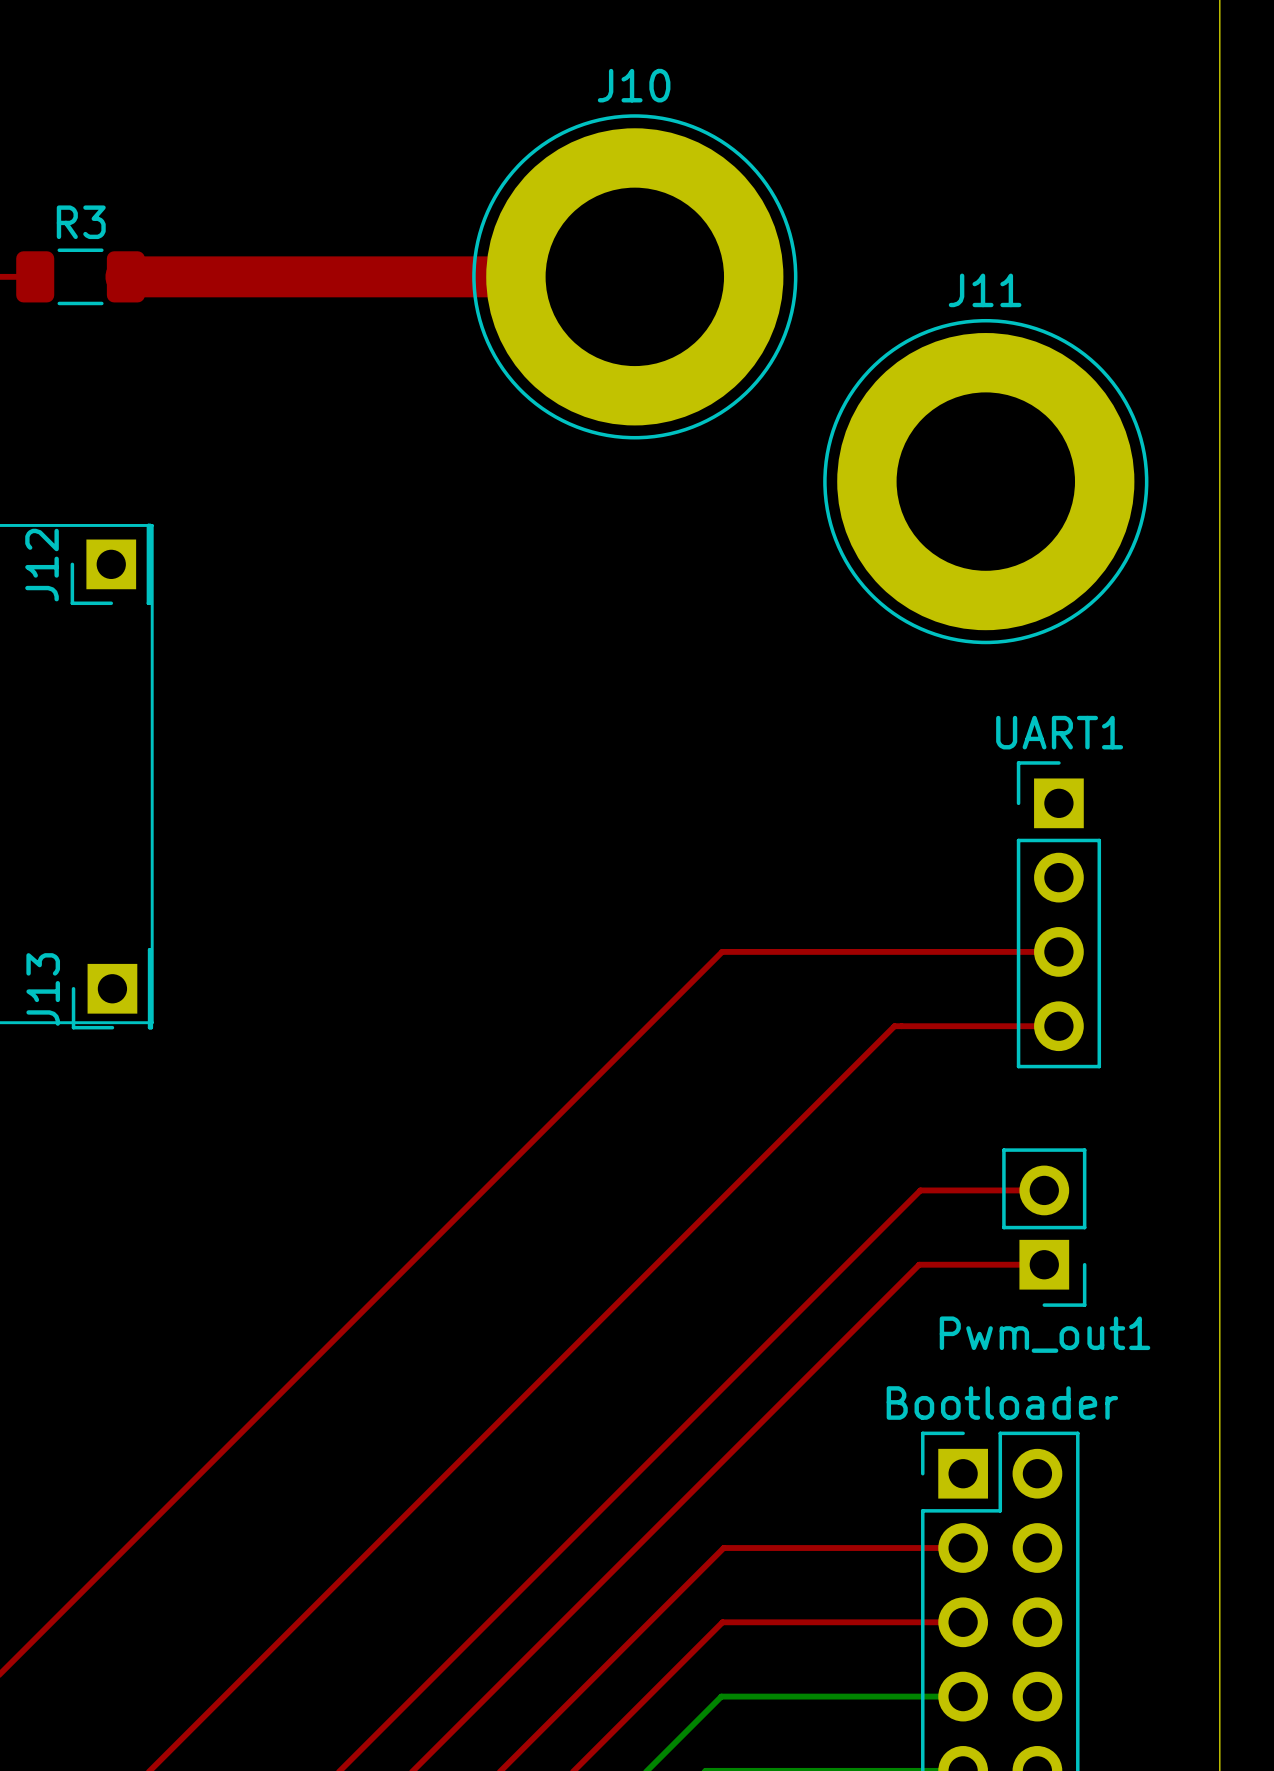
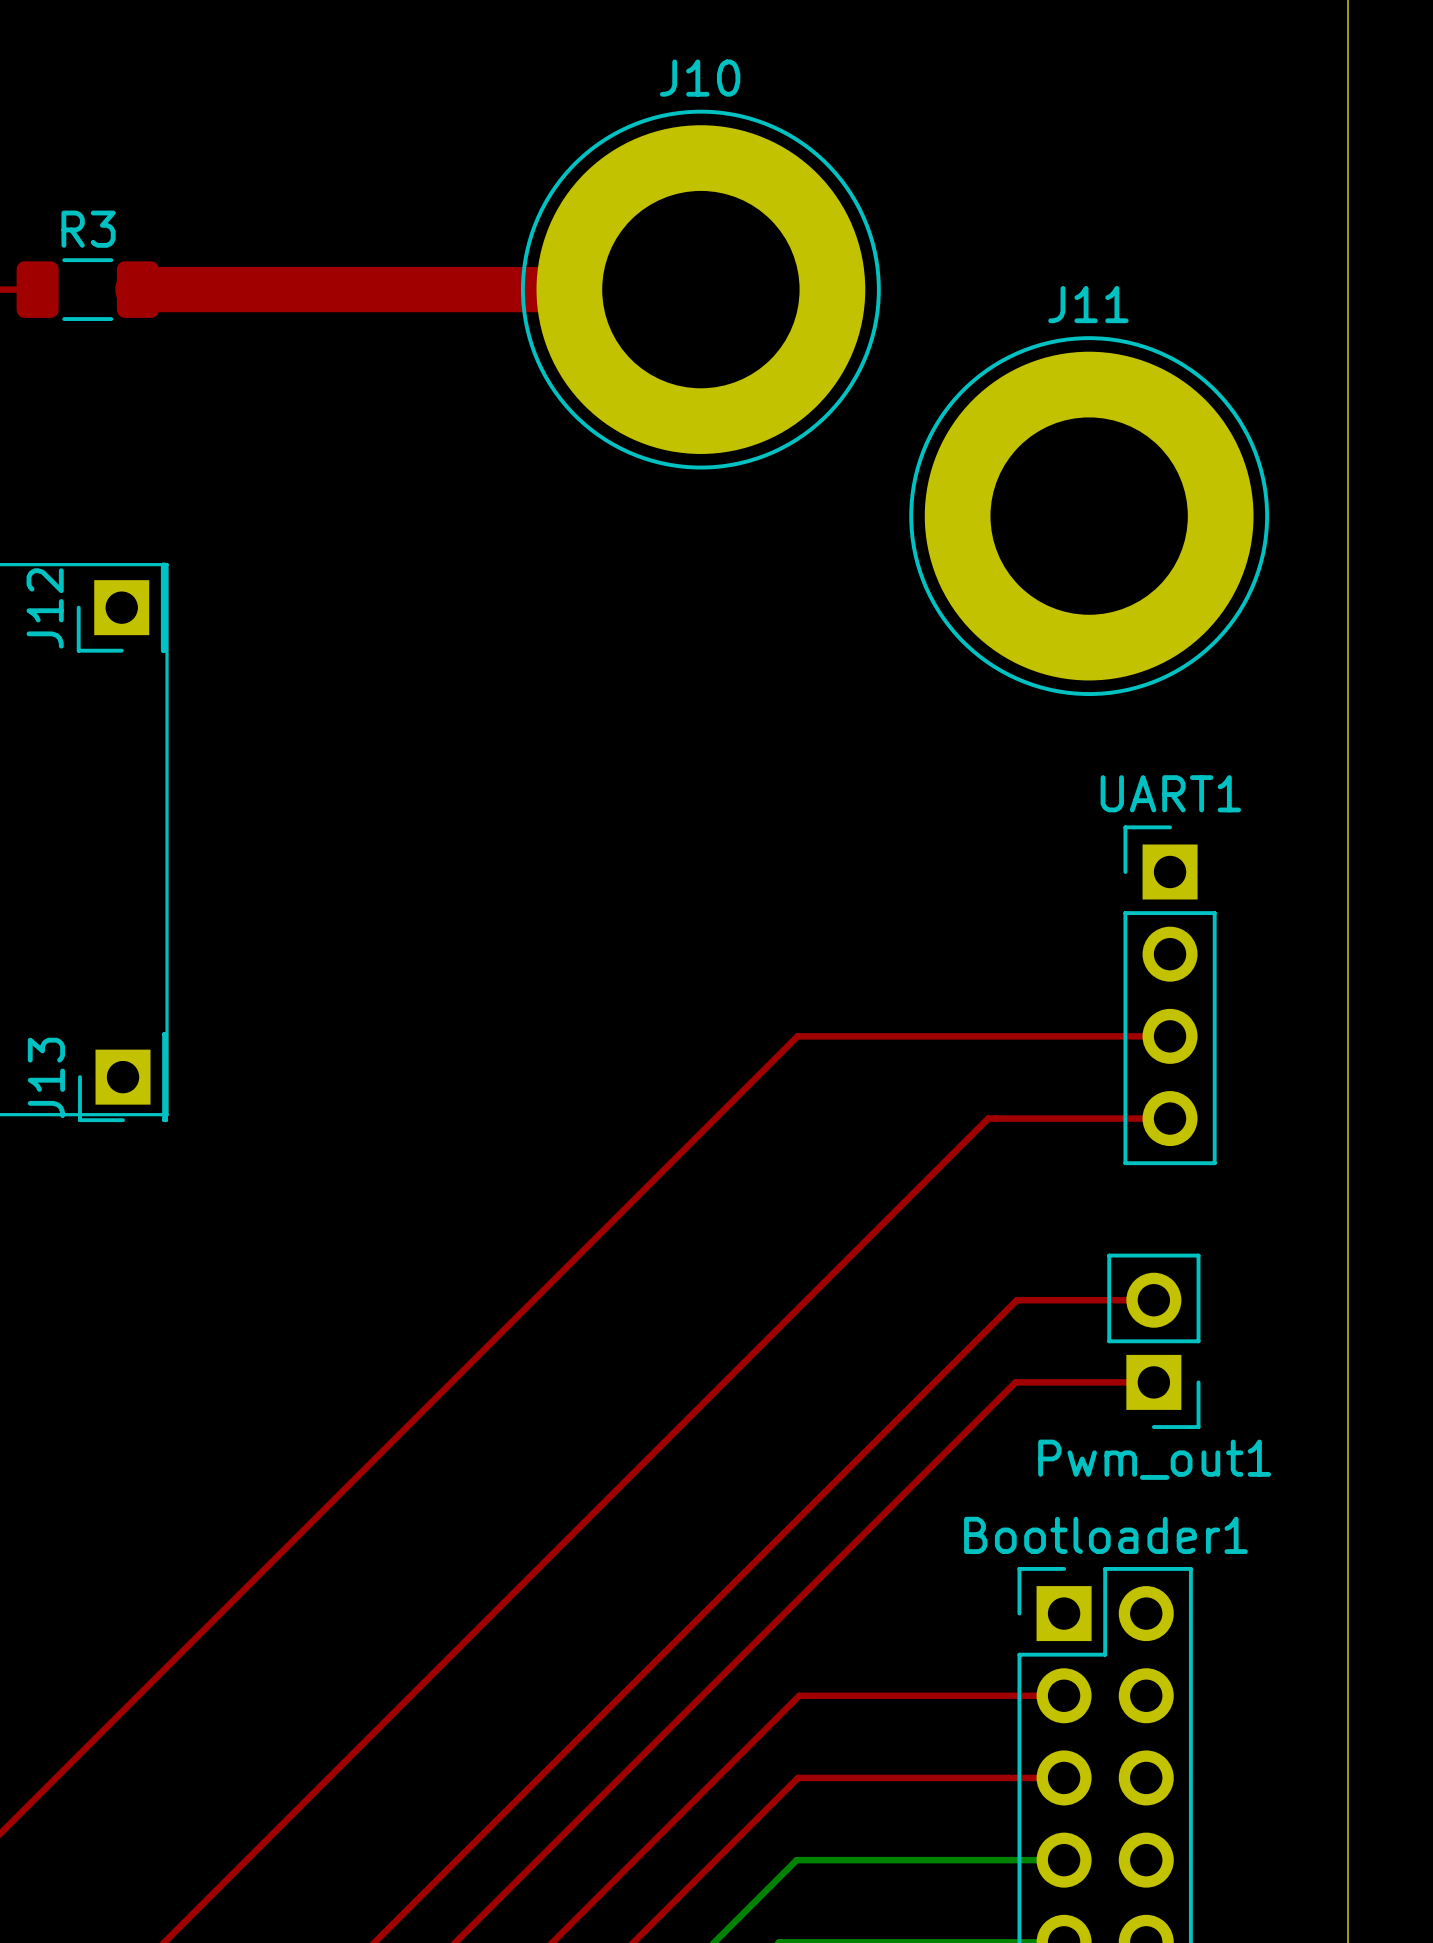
Bootloader name: Bootloader (1002, 1403) -> Bootloader1 (1105, 1535)

